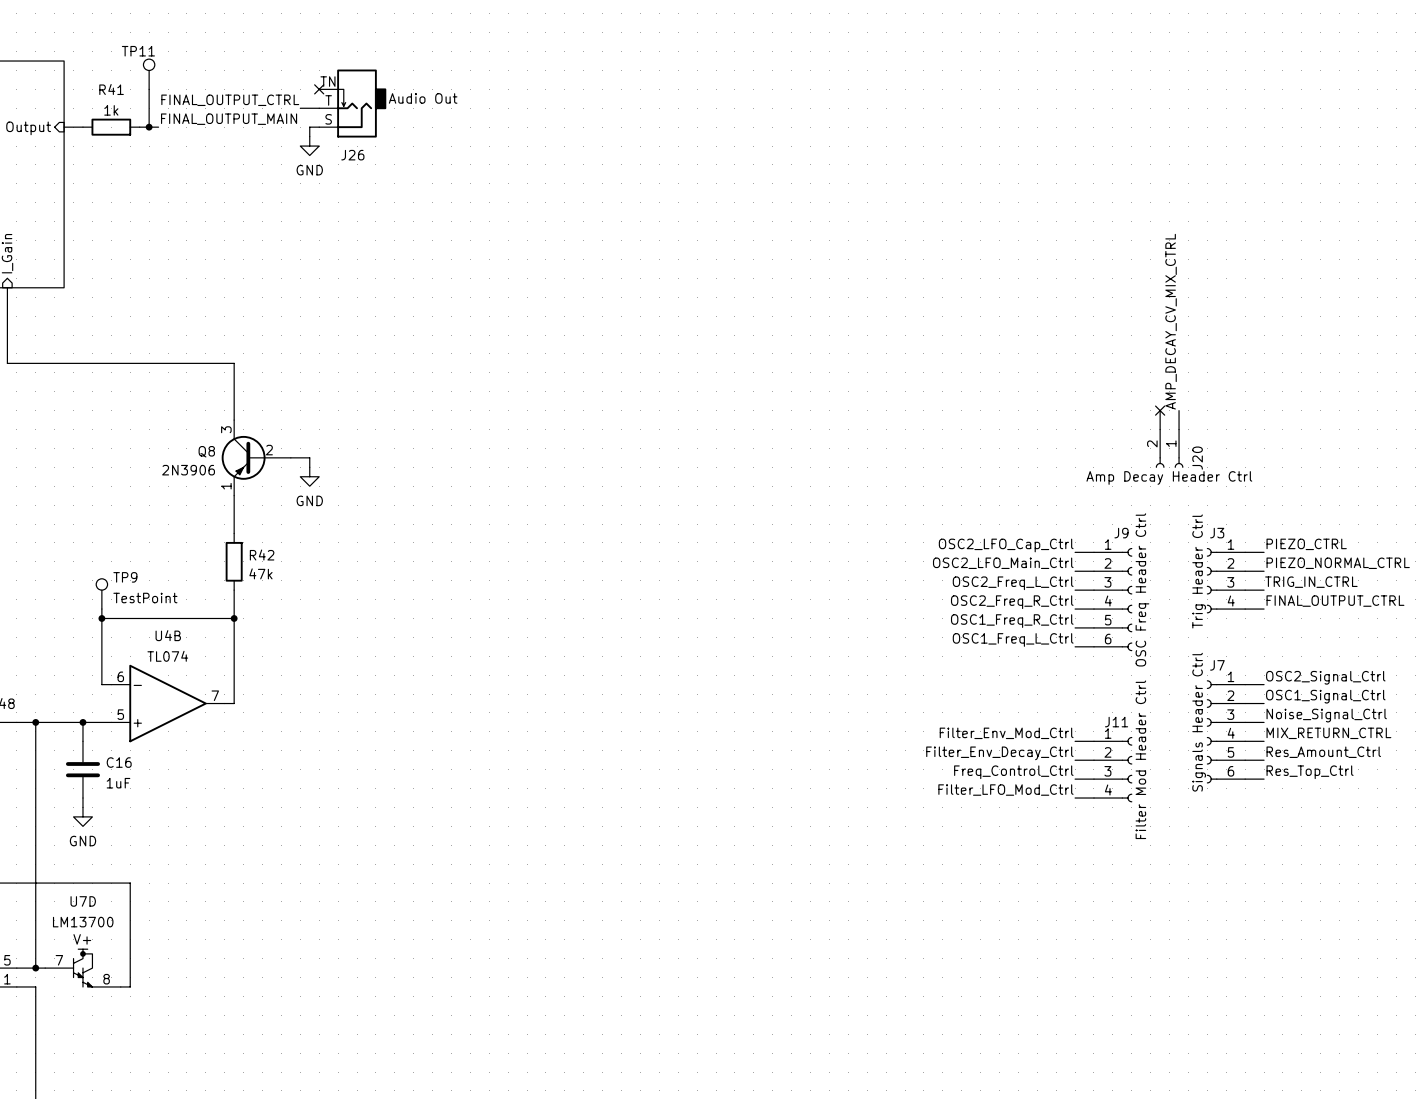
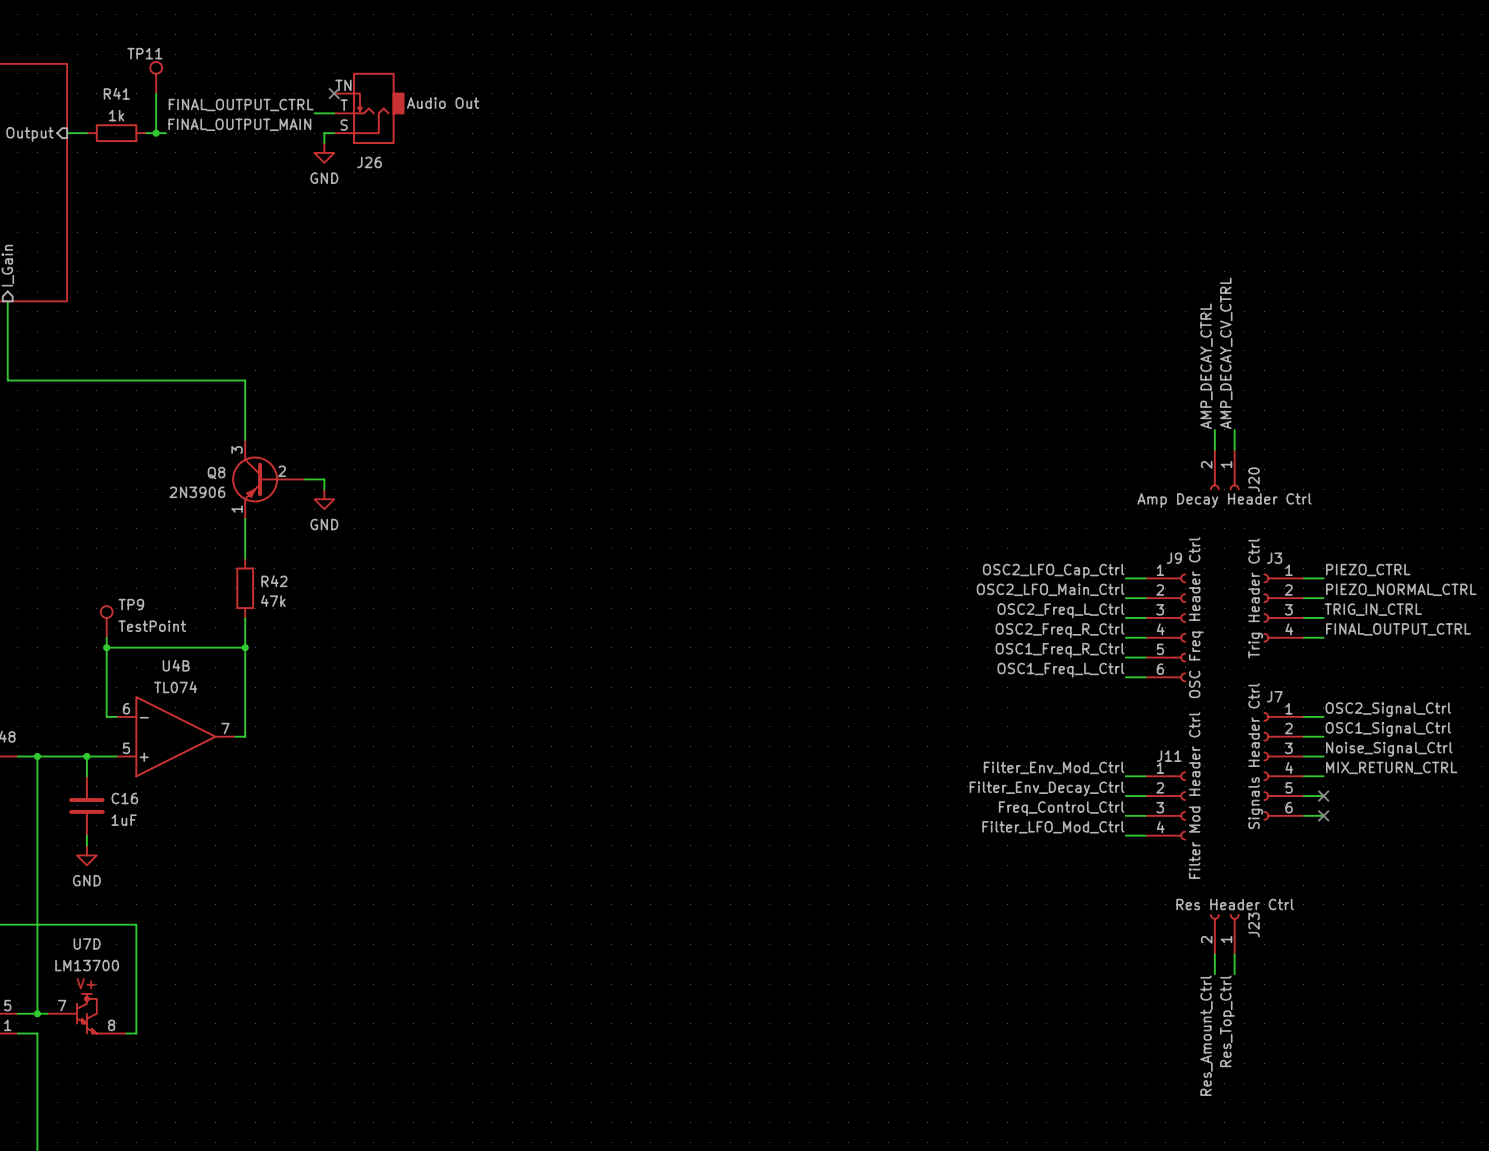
label: AMP_DECAY_CV_MIX_CTRL (1171, 321) -> AMP_DECAY_CV_CTRL (1226, 353)
label: none -> AMP_DECAY_CTRL (1206, 366)
no-connect mark: (1160, 410) -> none
label: Res_Amount_Ctrl (1323, 752) -> none
no-connect mark: none -> (1323, 796)
label rotation: 0° (1310, 772) -> 90° counterclockwise (1227, 1021)
label position: Res_Top_Ctrl (1310, 772) -> Res_Top_Ctrl (1227, 1021)
no-connect mark: none -> (1323, 815)
J23: none -> (1224, 934)
wire: none -> (1214, 954) (1214, 974)
wire: none -> (1234, 954) (1234, 974)
label: none -> Res_Amount_Ctrl (1206, 1035)

